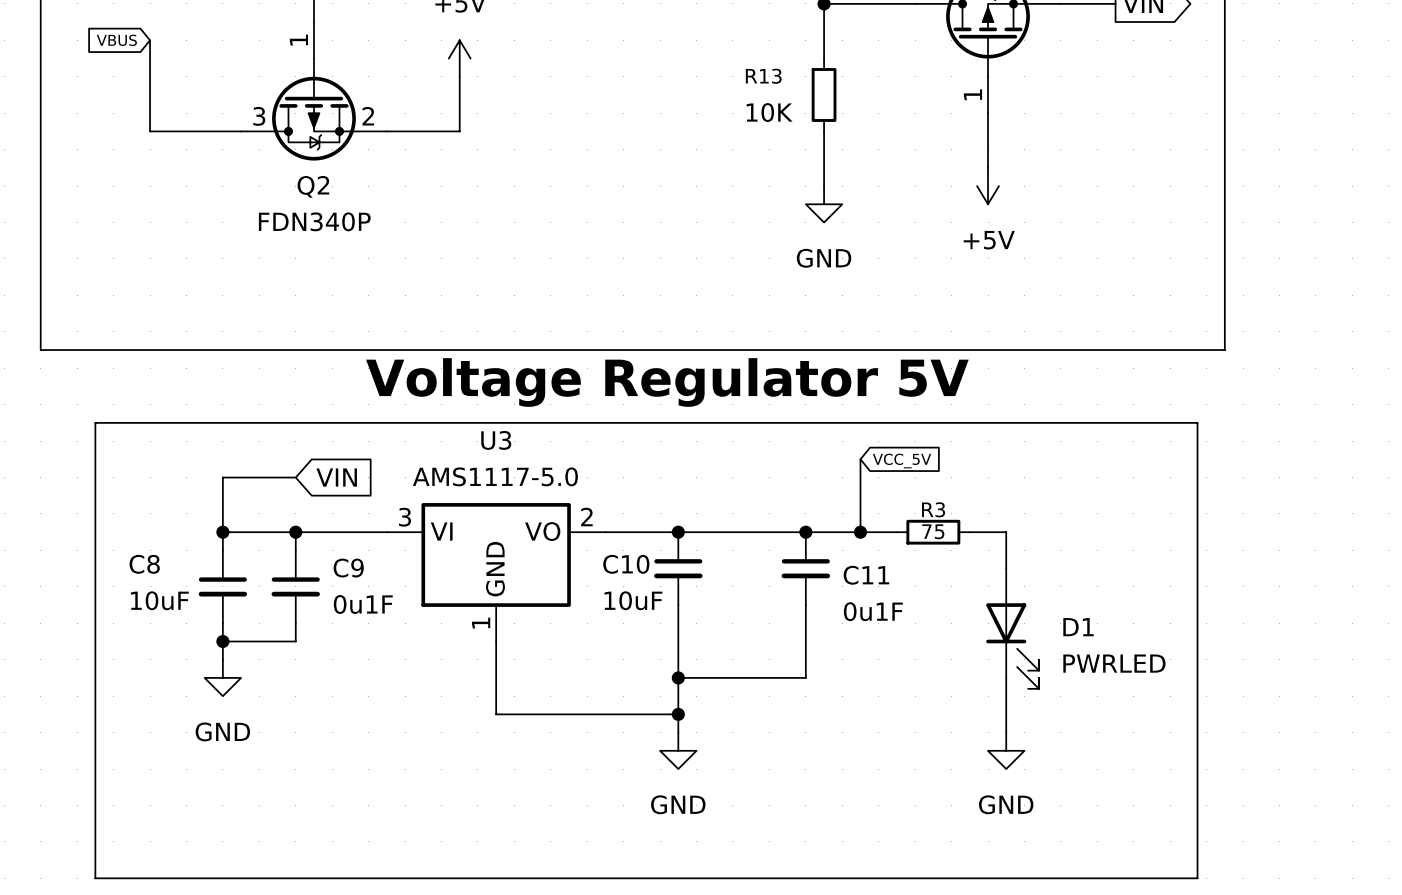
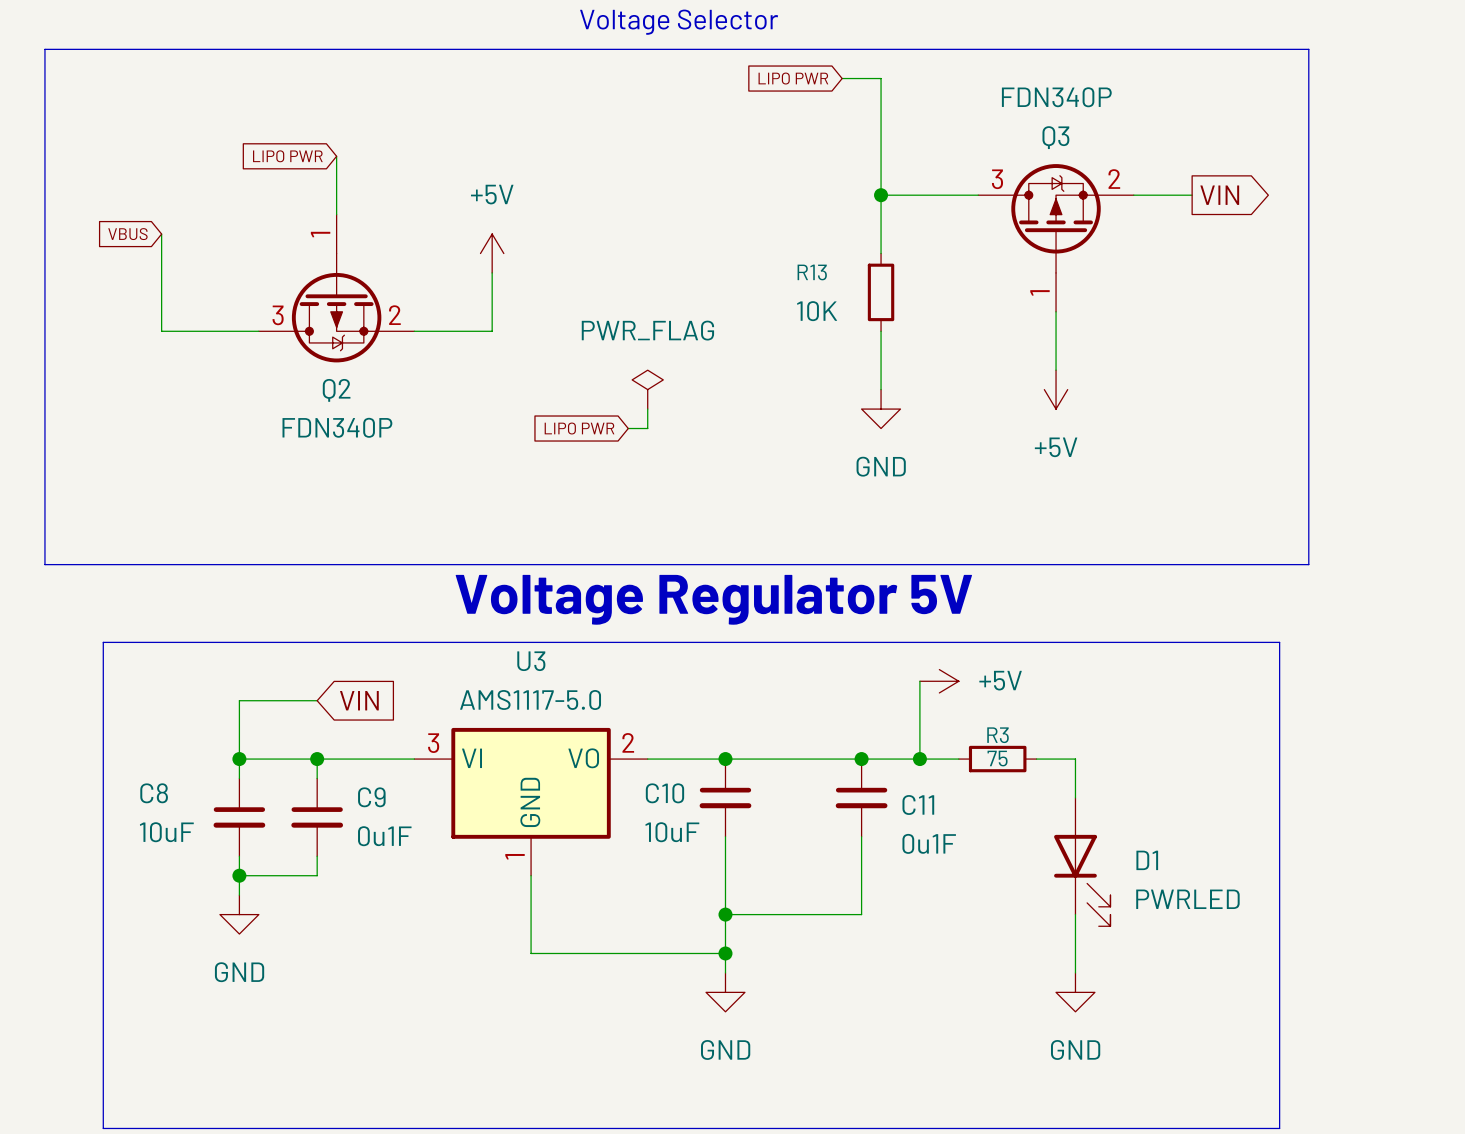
power symbol: none -> PWR_FLAG (647, 389)
wire: none -> (647, 409) (647, 428) (628, 428)
global label: none -> LIPO PWR (579, 428)
power symbol: none -> +5V (939, 681)
global label: VCC_5V (902, 461) -> none

